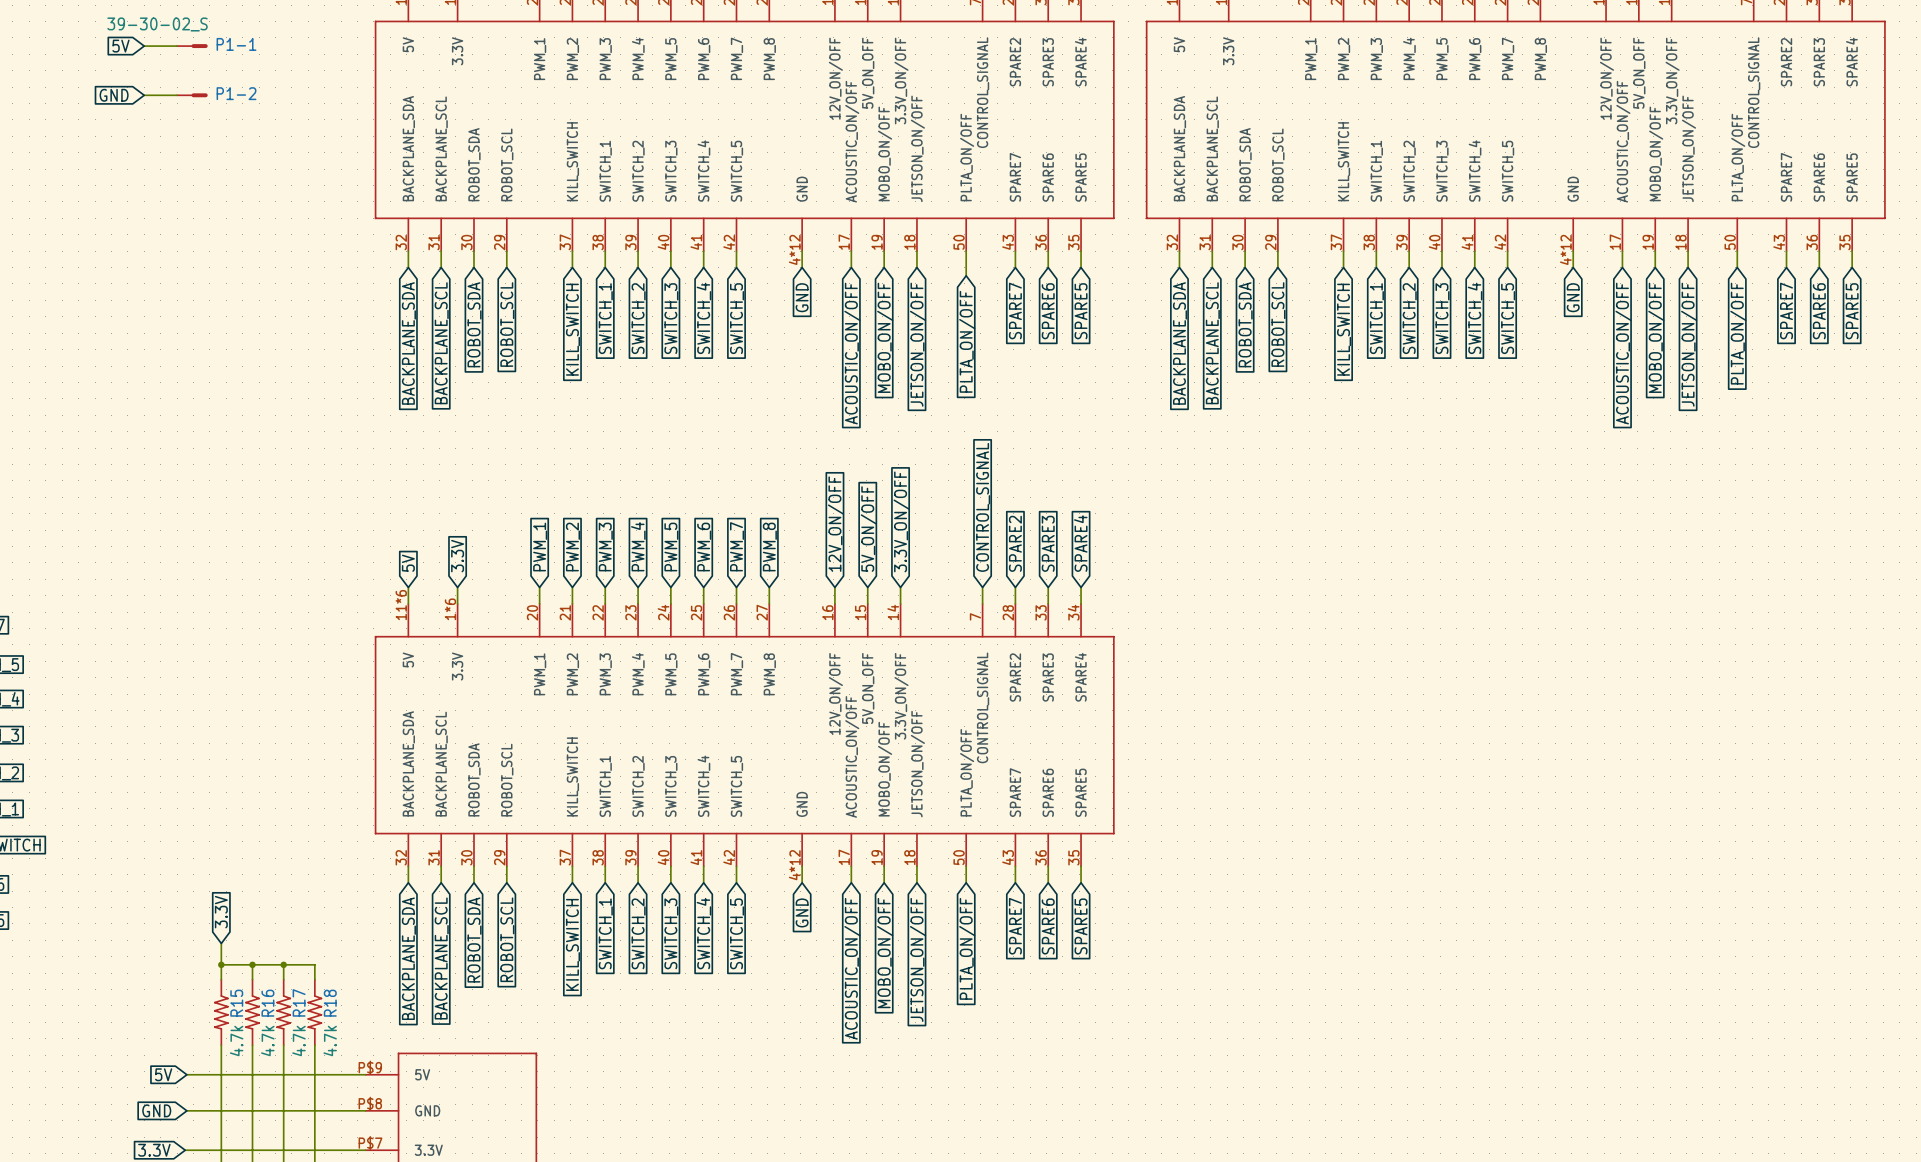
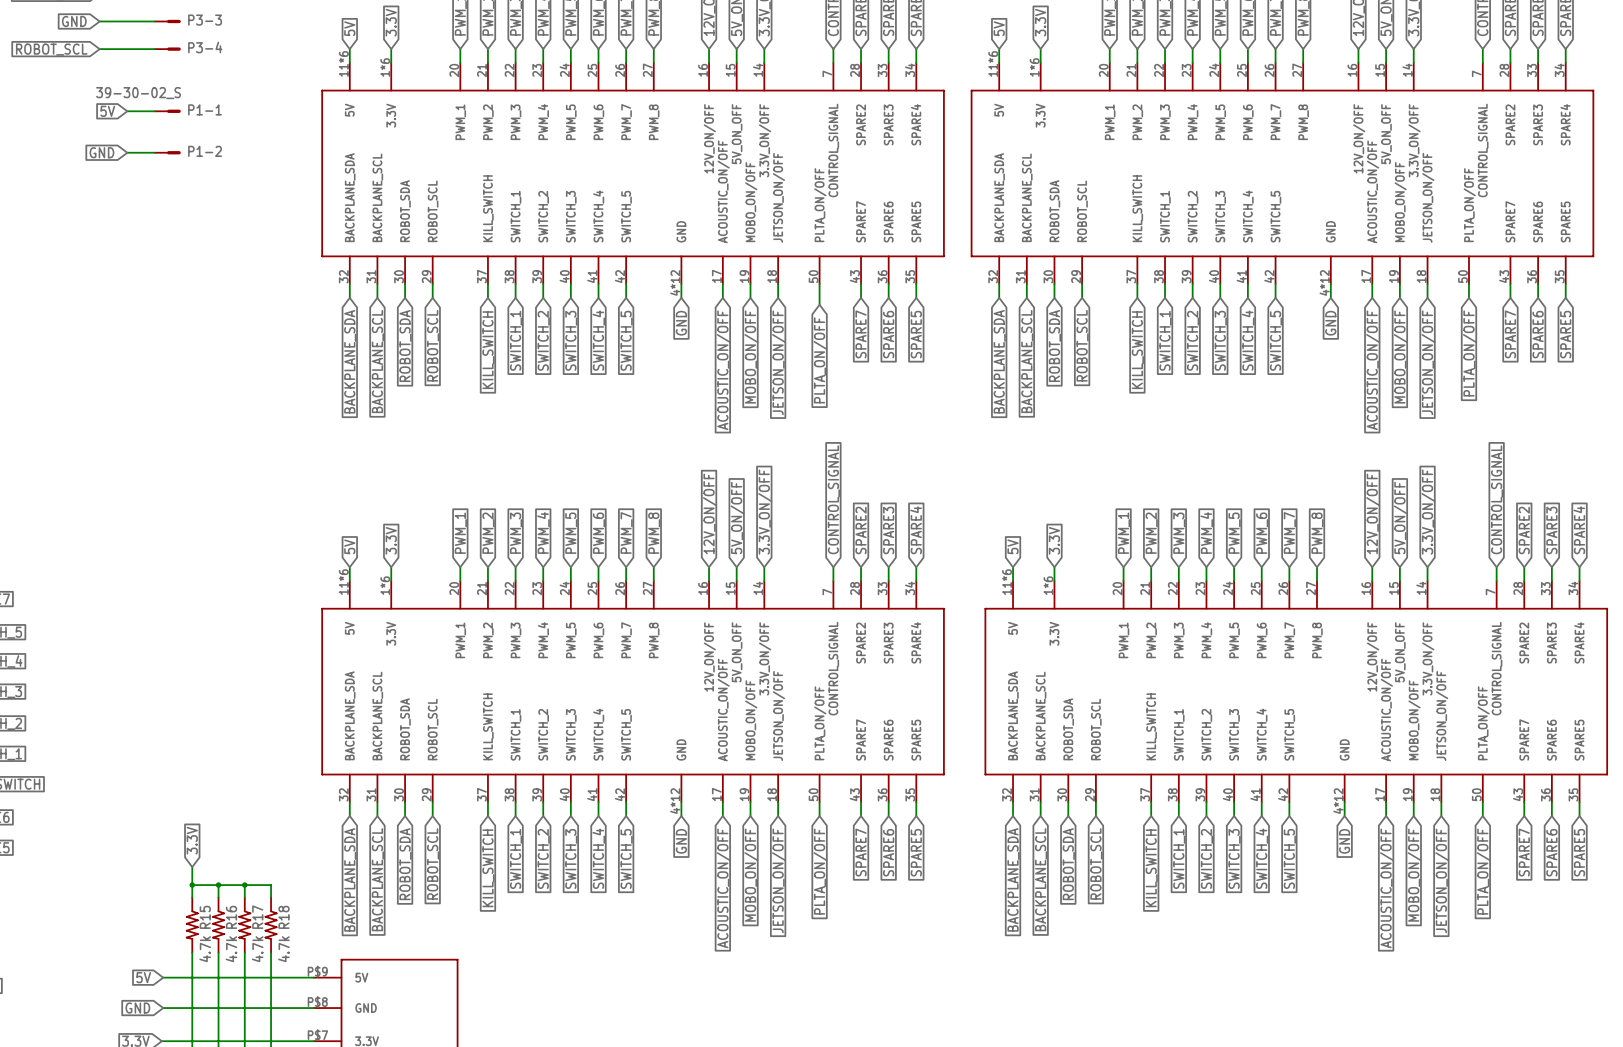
global label: none -> CONTROL_SIGNAL (1497, 499)
global label: none -> 3.3V_ON/OFF (1428, 512)
global label: none -> 12V_ON/OFF (1373, 513)
global label: none -> 5V_ON/OFF (1400, 518)
global label: none -> SPARE2 (1524, 530)
global label: none -> SPARE3 (1551, 530)
global label: none -> SPARE4 (1579, 530)
global label: none -> PWM_4 (1206, 532)
global label: none -> PWM_7 (1289, 532)
global label: none -> PWM_1 (1124, 533)
global label: none -> PWM_2 (1151, 533)
global label: none -> PWM_3 (1179, 533)
global label: none -> PWM_5 (1234, 533)
global label: none -> PWM_6 (1262, 533)
global label: none -> PWM_8 (1317, 533)
global label: none -> 3.3V (1054, 540)
global label: none -> 5V (1013, 546)
wire: none -> (1013, 567) (1013, 581)
wire: none -> (1054, 567) (1054, 581)
wire: none -> (1123, 567) (1123, 581)
wire: none -> (1151, 567) (1151, 581)
wire: none -> (1178, 567) (1178, 581)
wire: none -> (1206, 567) (1206, 581)
wire: none -> (1234, 567) (1234, 581)
wire: none -> (1261, 567) (1261, 581)
wire: none -> (1289, 567) (1289, 581)
wire: none -> (1317, 567) (1317, 581)
wire: none -> (1372, 567) (1372, 581)
wire: none -> (1399, 567) (1399, 581)
wire: none -> (1427, 567) (1427, 581)
wire: none -> (1496, 567) (1496, 581)
wire: none -> (1524, 567) (1524, 581)
wire: none -> (1551, 567) (1551, 581)
wire: none -> (1579, 567) (1579, 581)
part: none -> (1296, 691)
wire: none -> (1013, 802) (1013, 815)
wire: none -> (1040, 802) (1040, 815)
wire: none -> (1068, 802) (1068, 815)
wire: none -> (1095, 802) (1095, 815)
wire: none -> (1151, 802) (1151, 815)
wire: none -> (1178, 802) (1178, 815)
wire: none -> (1206, 802) (1206, 815)
wire: none -> (1234, 802) (1234, 815)
wire: none -> (1261, 802) (1261, 815)
wire: none -> (1289, 802) (1289, 815)
wire: none -> (1344, 802) (1344, 815)
wire: none -> (1386, 802) (1386, 815)
wire: none -> (1413, 802) (1413, 815)
wire: none -> (1441, 802) (1441, 815)
wire: none -> (1482, 802) (1482, 815)
wire: none -> (1524, 802) (1524, 815)
wire: none -> (1551, 802) (1551, 815)
wire: none -> (1579, 802) (1579, 815)
global label: none -> GND (1344, 841)
global label: none -> SPARE7 (1524, 852)
global label: none -> SPARE6 (1551, 852)
global label: none -> SPARE5 (1579, 852)
global label: none -> SWITCH_1 (1179, 858)
global label: none -> SWITCH_2 (1206, 858)
global label: none -> SWITCH_3 (1234, 858)
global label: none -> SWITCH_4 (1261, 858)
global label: none -> SWITCH_5 (1289, 858)
global label: none -> ROBOT_SCL (1096, 863)
global label: none -> ROBOT_SDA (1068, 864)
global label: none -> KILL_SWITCH (1151, 868)
global label: none -> PLTA_ON/OFF (1483, 871)
global label: none -> MOBO_ON/OFF (1414, 875)
global label: none -> BACKPLANE_SDA (1013, 879)
global label: none -> BACKPLANE_SCL (1041, 879)
global label: none -> JETSON_ON/OFF (1442, 880)
global label: none -> ACOUSTIC_ON/OFF (1387, 888)

